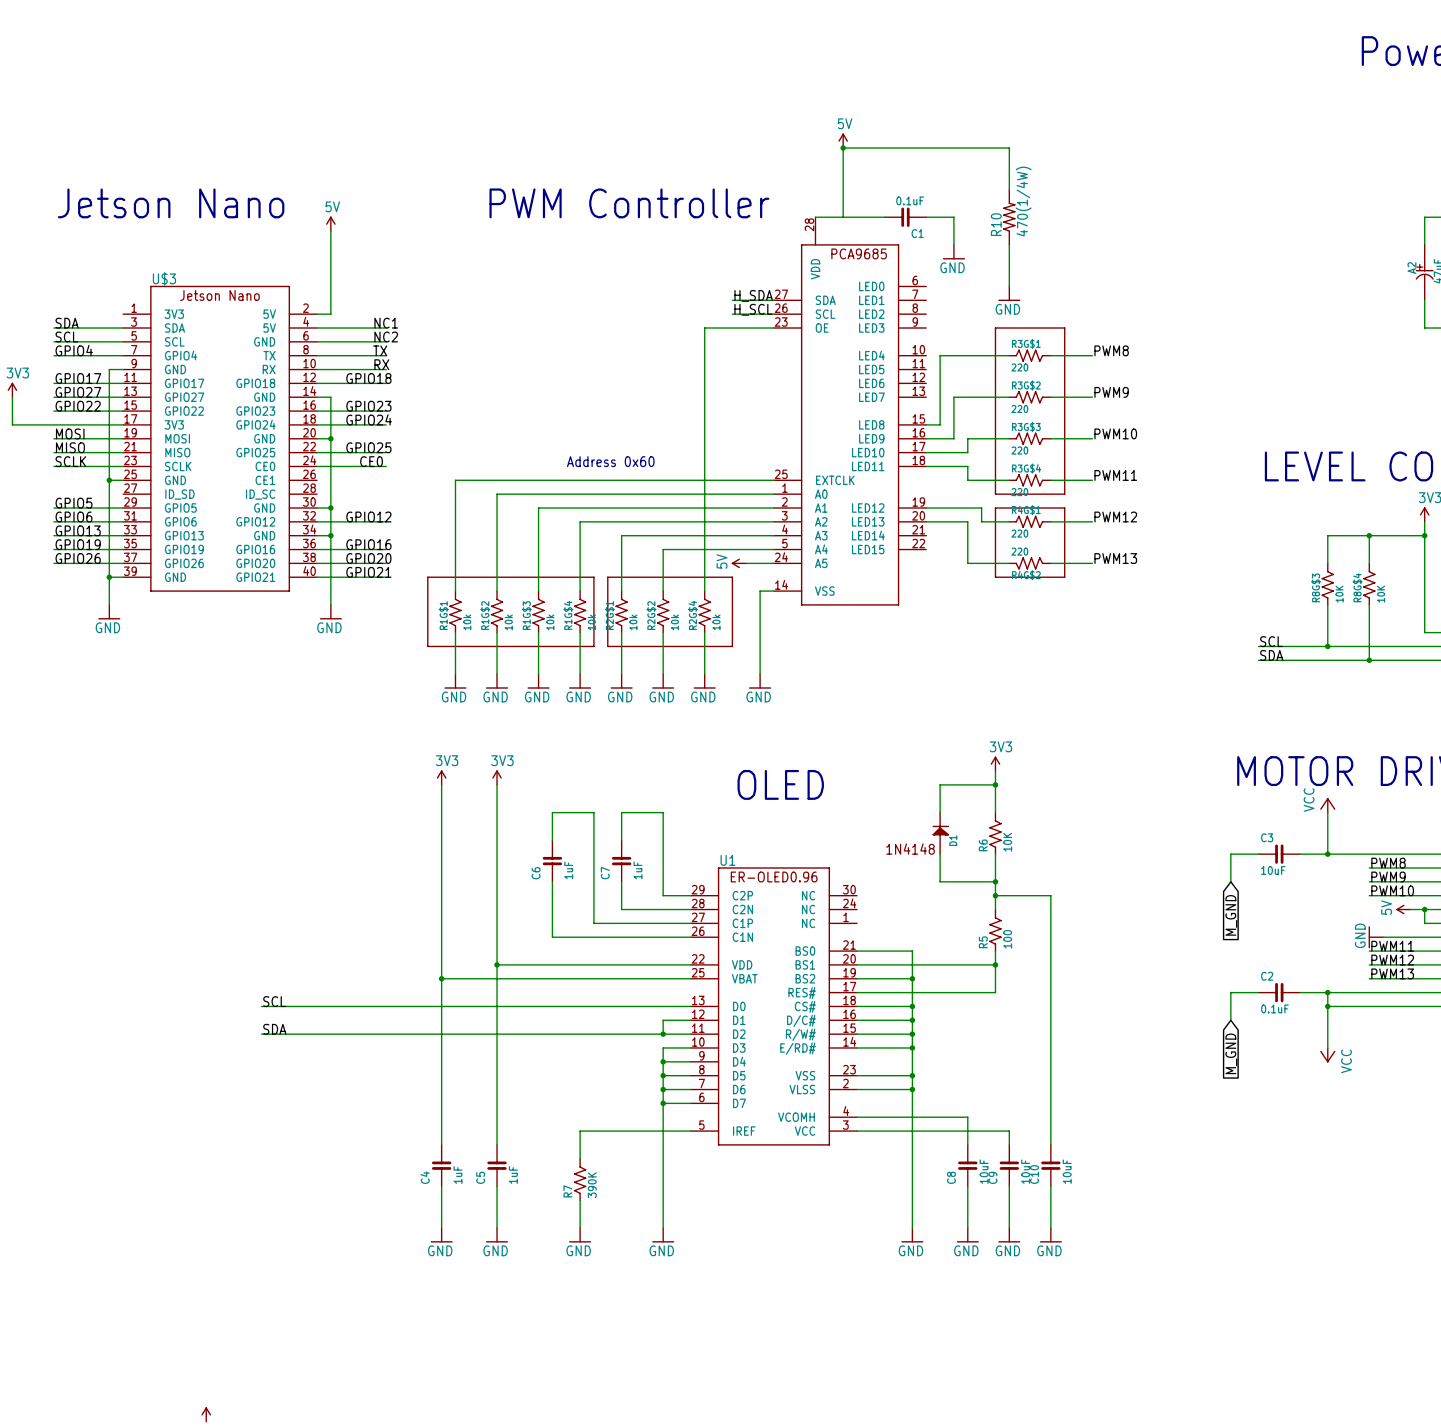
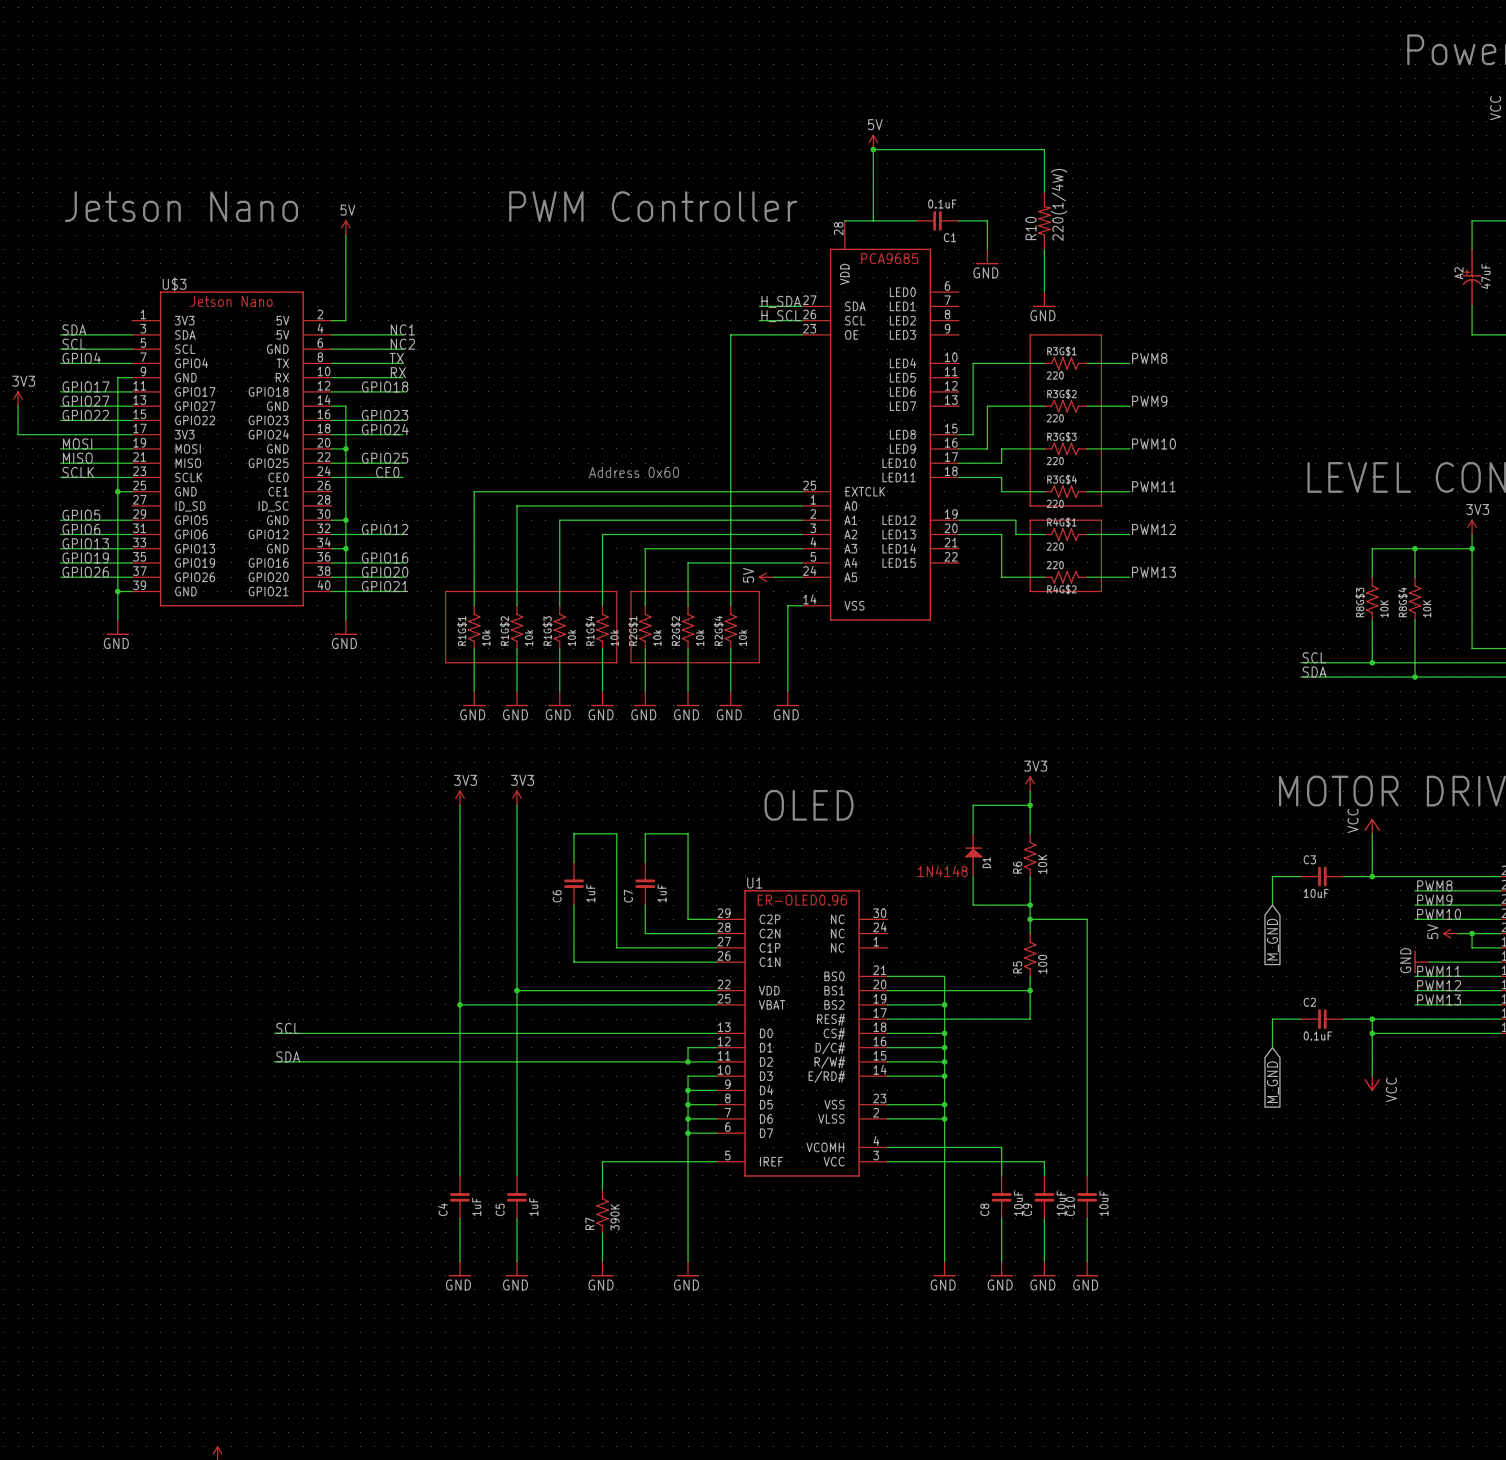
R10 value: 470(1/4W) (1023, 201) -> 220(1/4W) (1059, 204)

